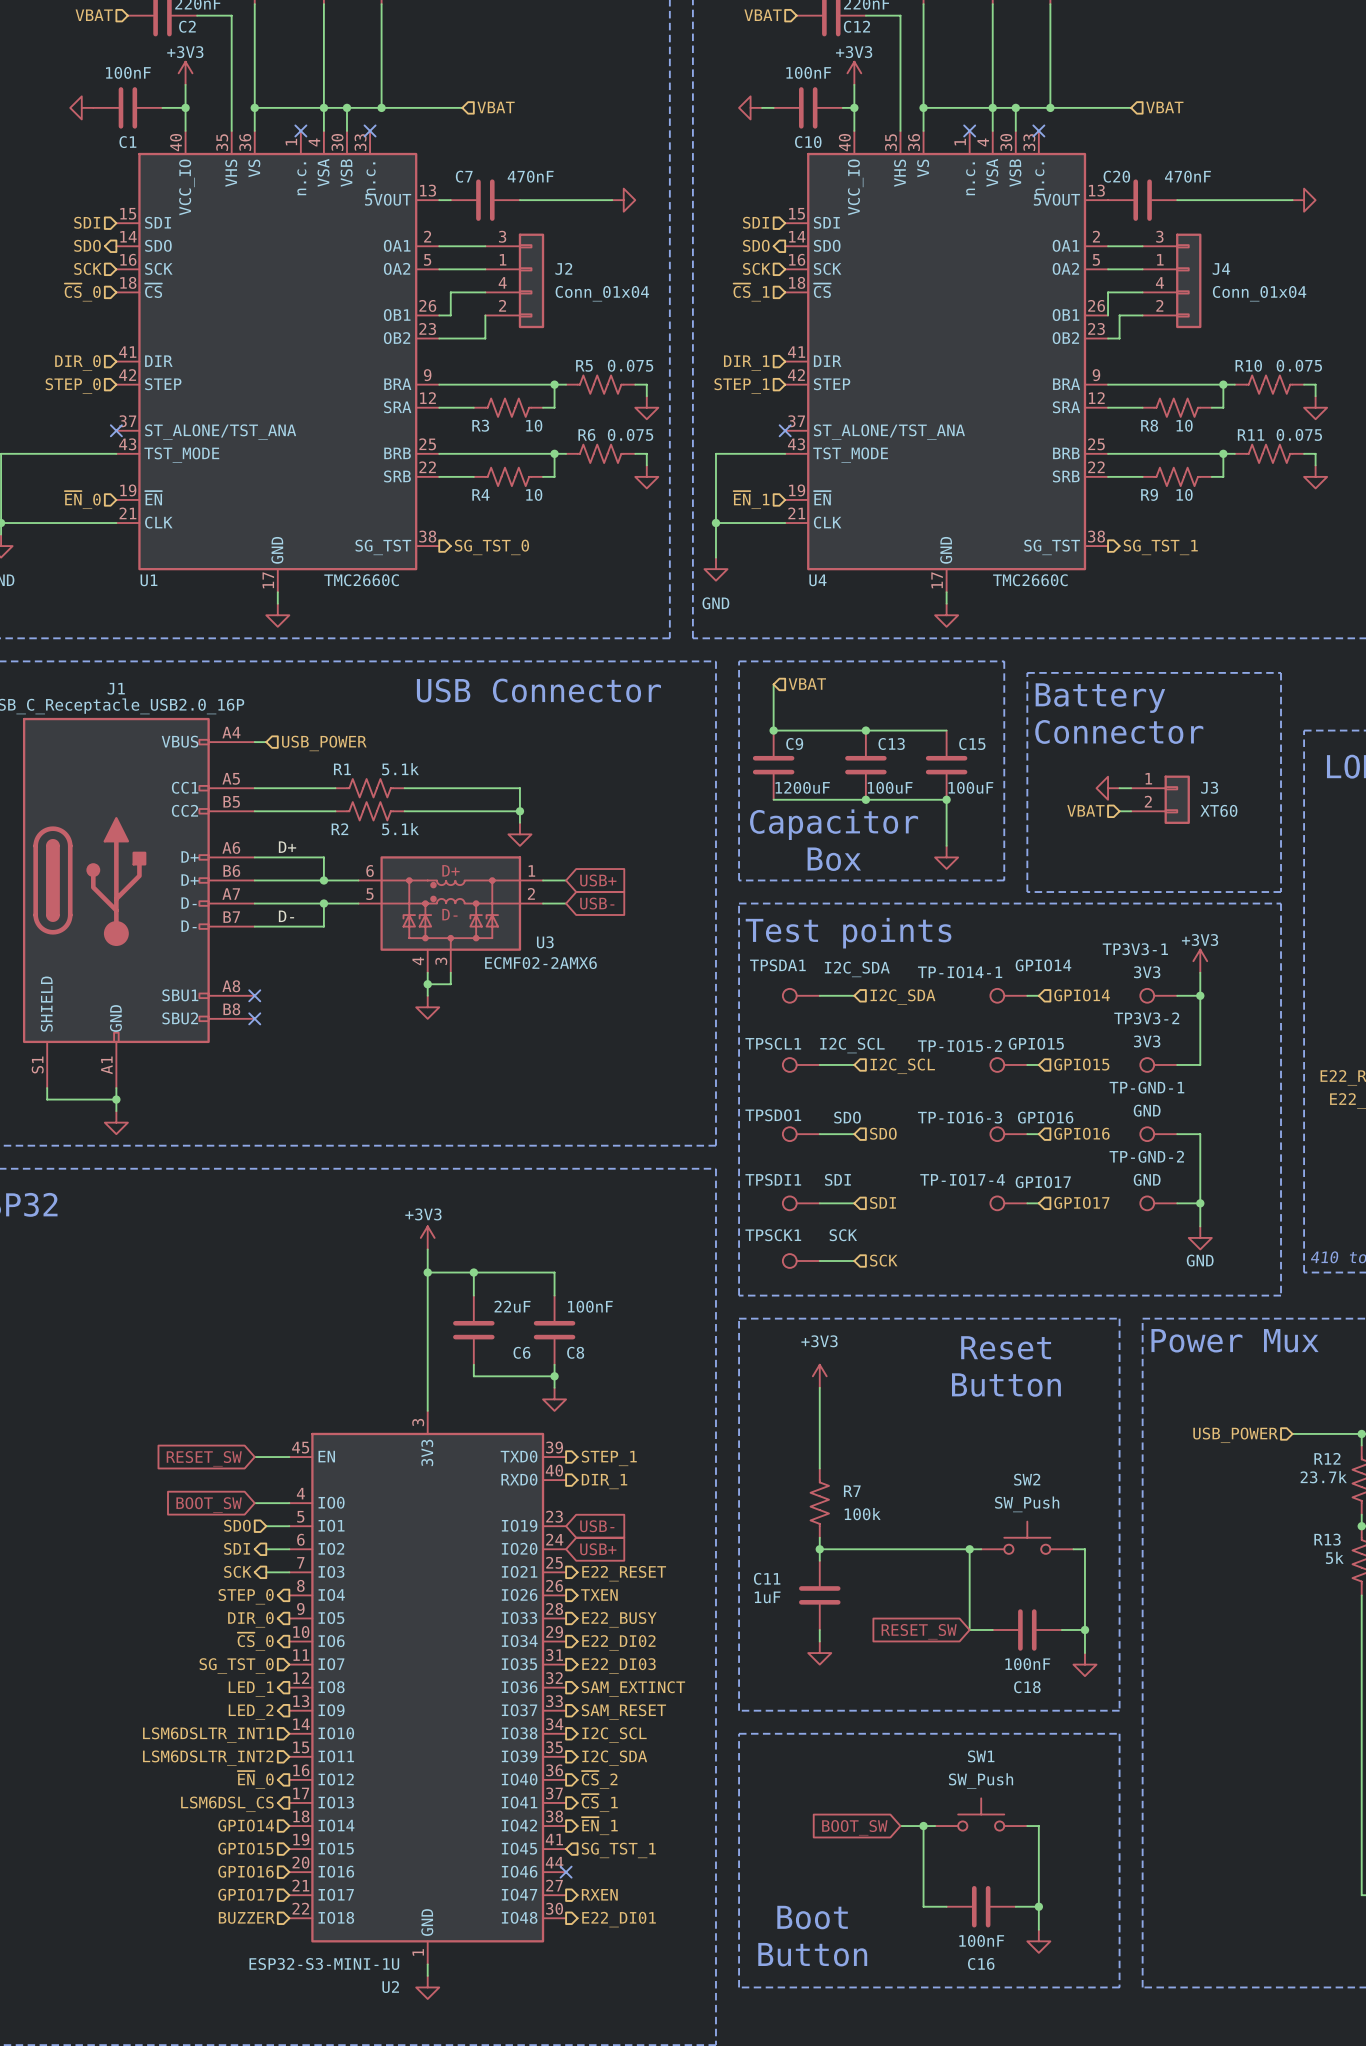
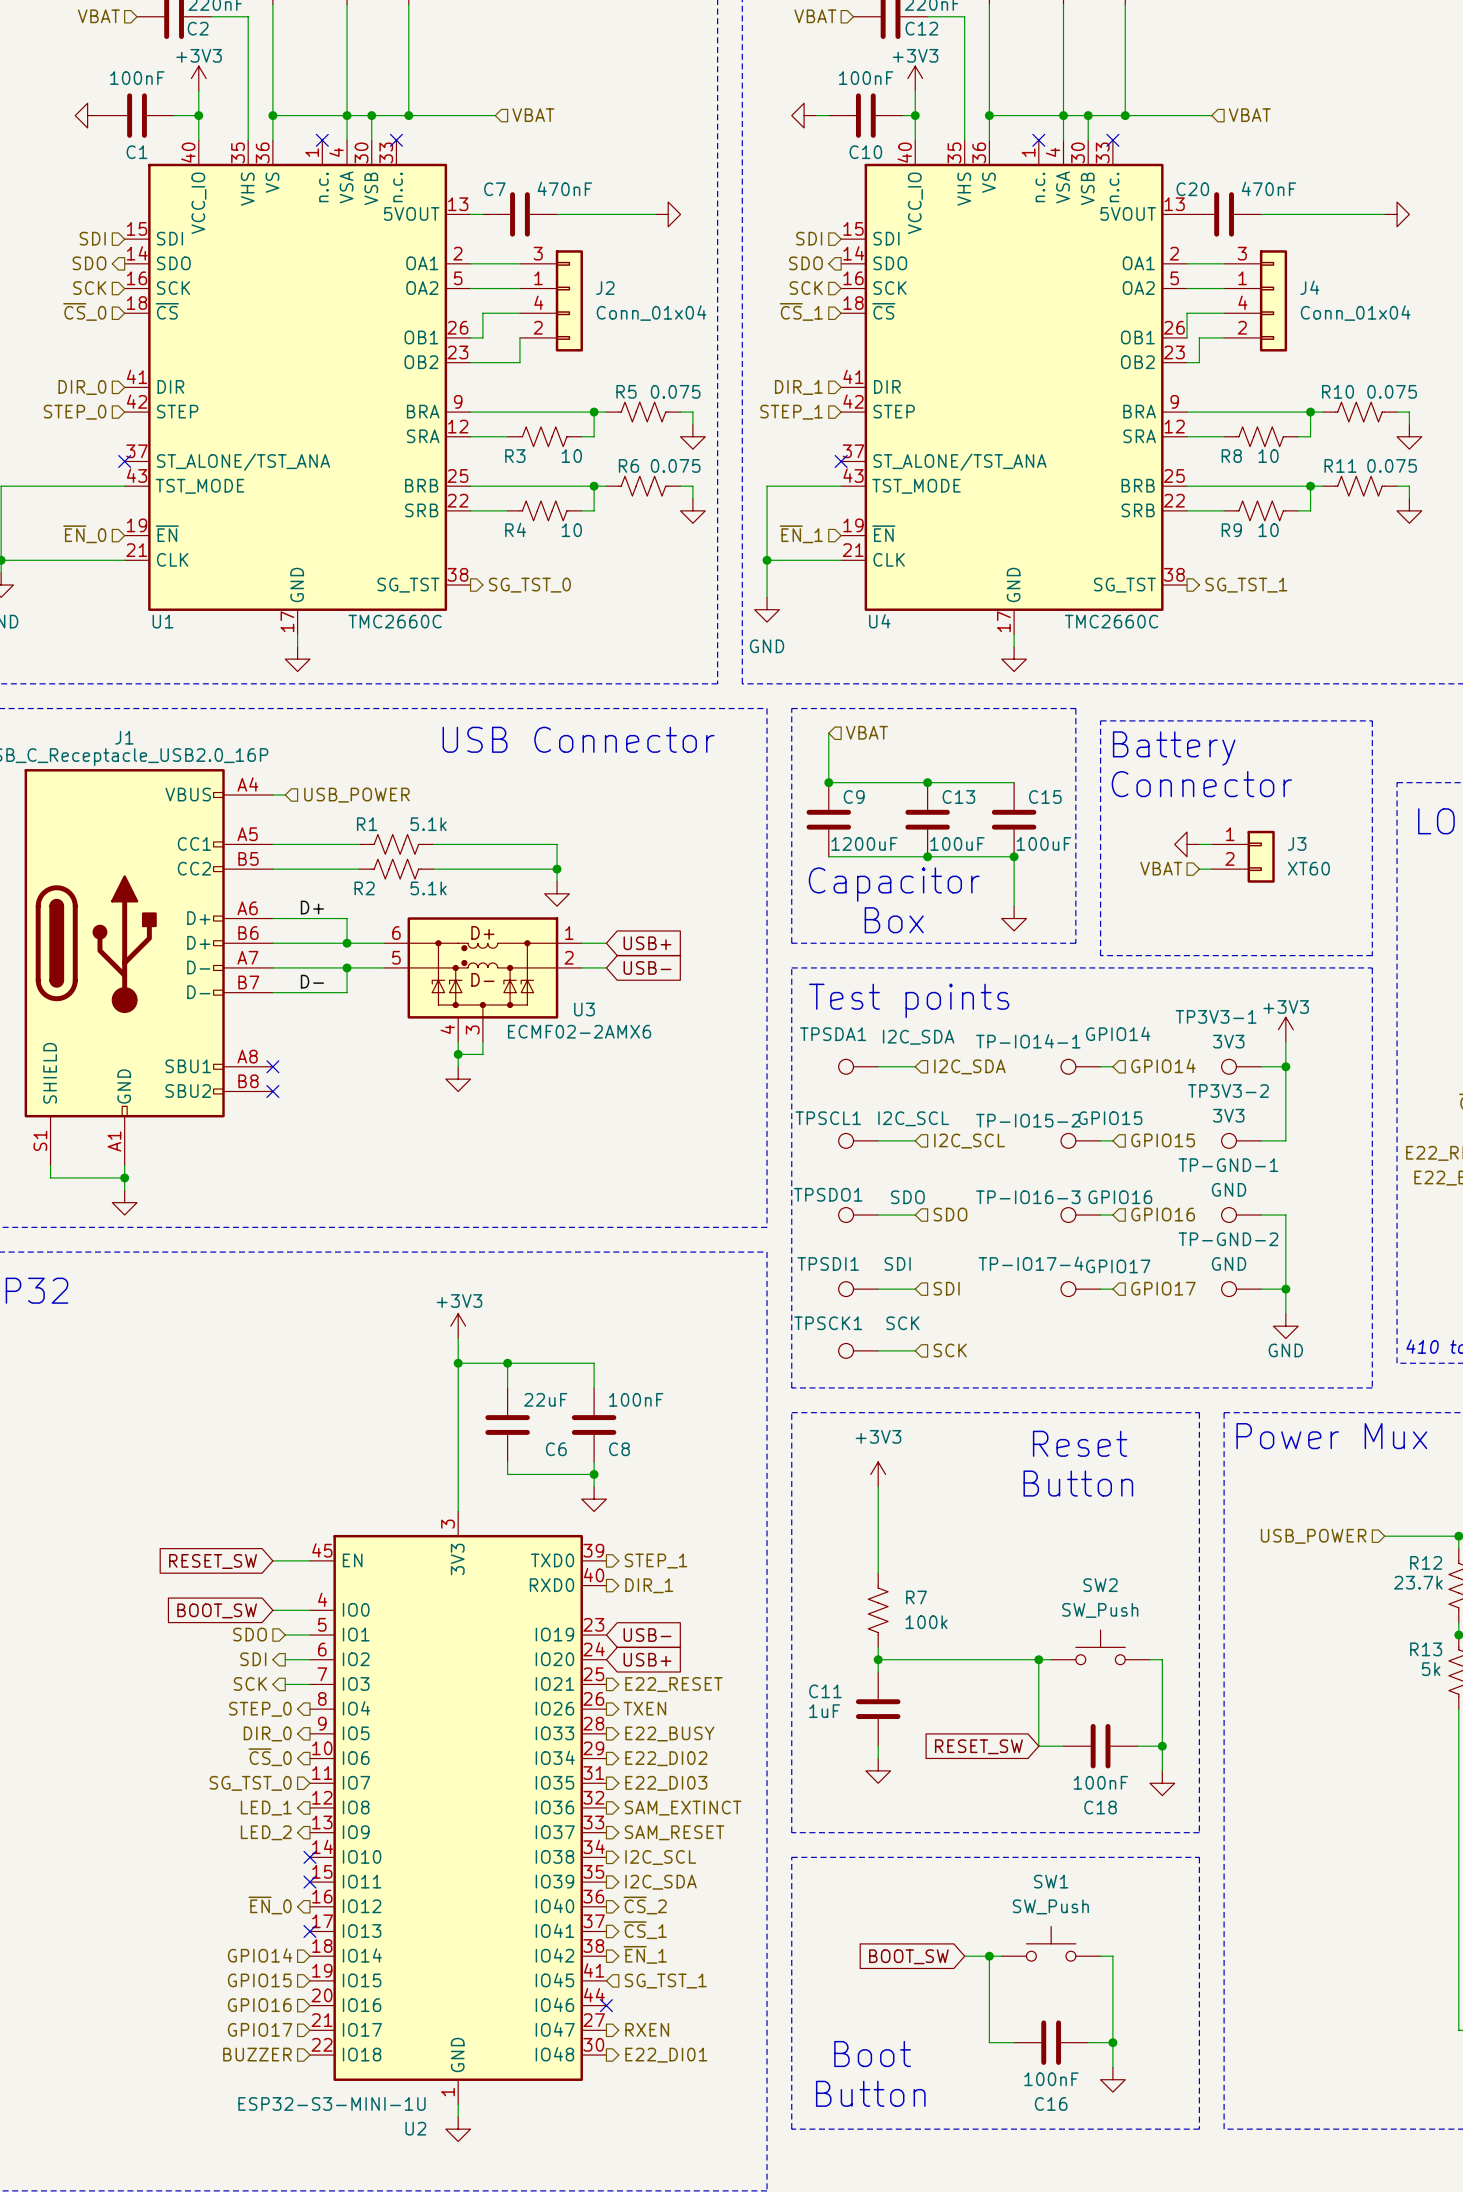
no-connect mark: none -> (309, 1857)
hierarchical label: LSM6DSLTR_INT1 (208, 1735) -> none
no-connect mark: none -> (309, 1882)
hierarchical label: LSM6DSLTR_INT2 (208, 1758) -> none
no-connect mark: none -> (309, 1931)
hierarchical label: LSM6DSL_CS (227, 1804) -> none

